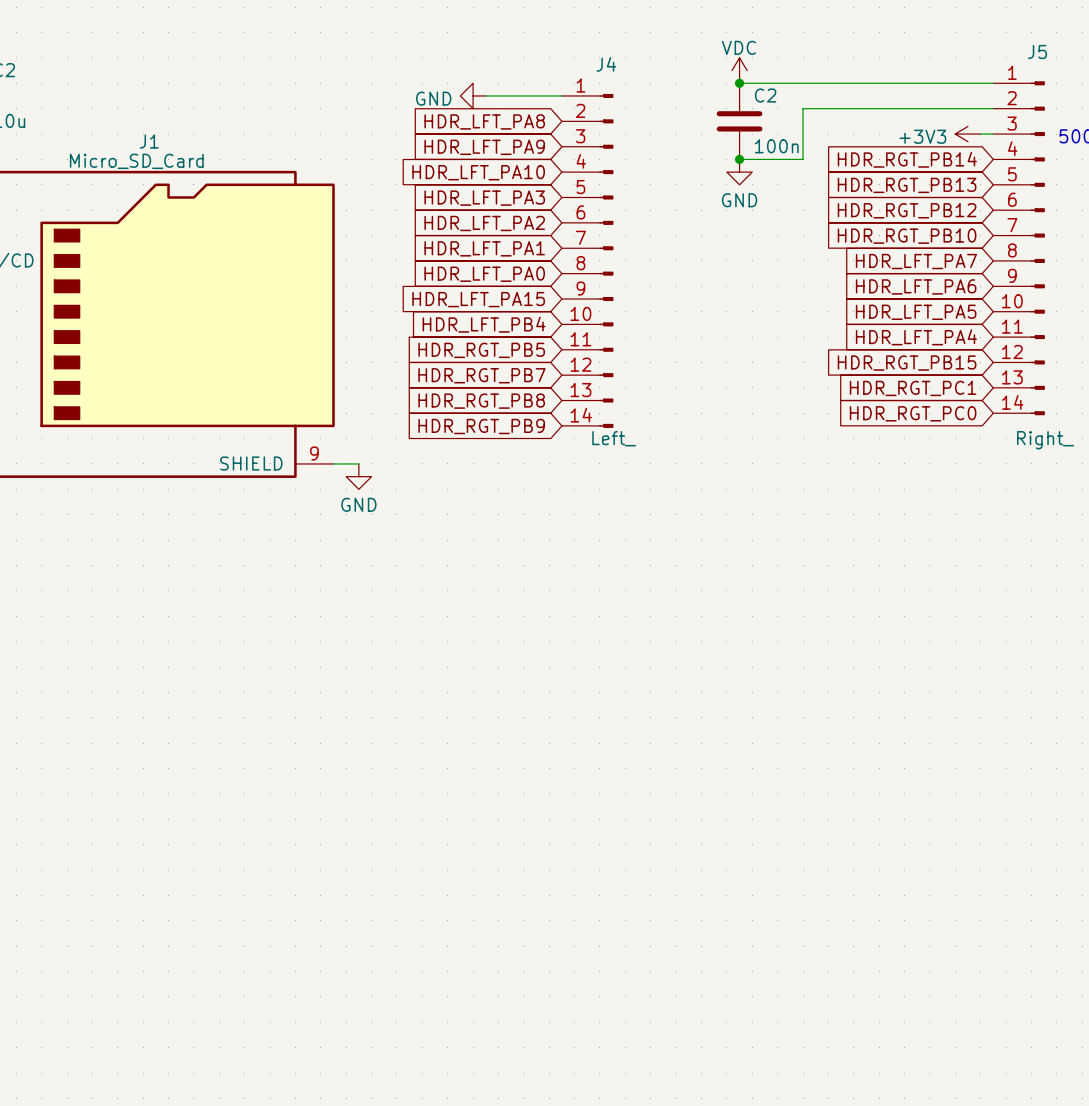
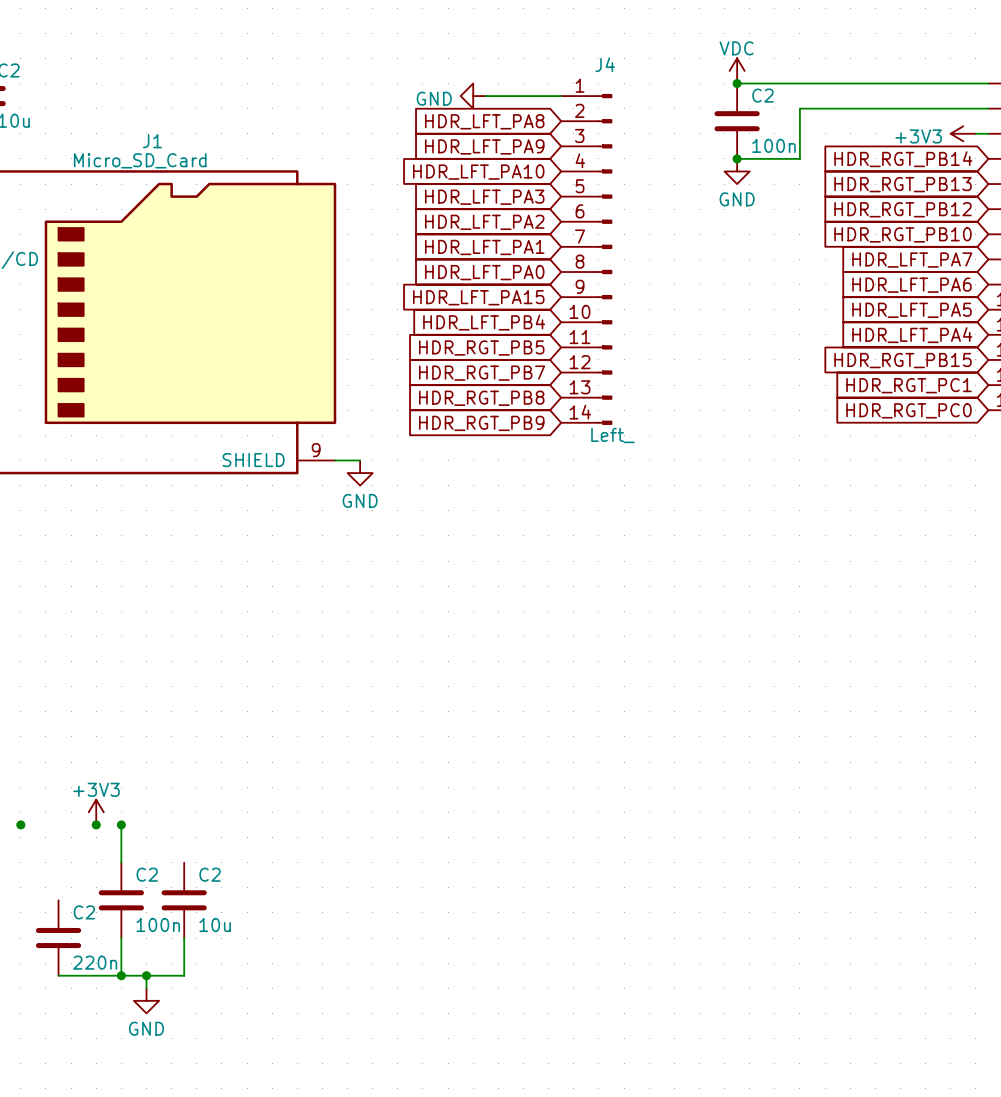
power symbol: none -> +3V3 (96, 812)
junction: none -> (20, 824)
junction: none -> (96, 824)
wire: none -> (121, 824) (121, 862)
junction: none -> (121, 824)
C2: none -> 100n (121, 900)
C2: none -> 10u (184, 900)
C2: none -> 220n (58, 938)
wire: none -> (121, 938) (121, 975)
wire: none -> (184, 938) (184, 975) (58, 975)
junction: none -> (121, 975)
wire: none -> (146, 975) (146, 988)
junction: none -> (146, 975)
power symbol: none -> GND (146, 1000)

